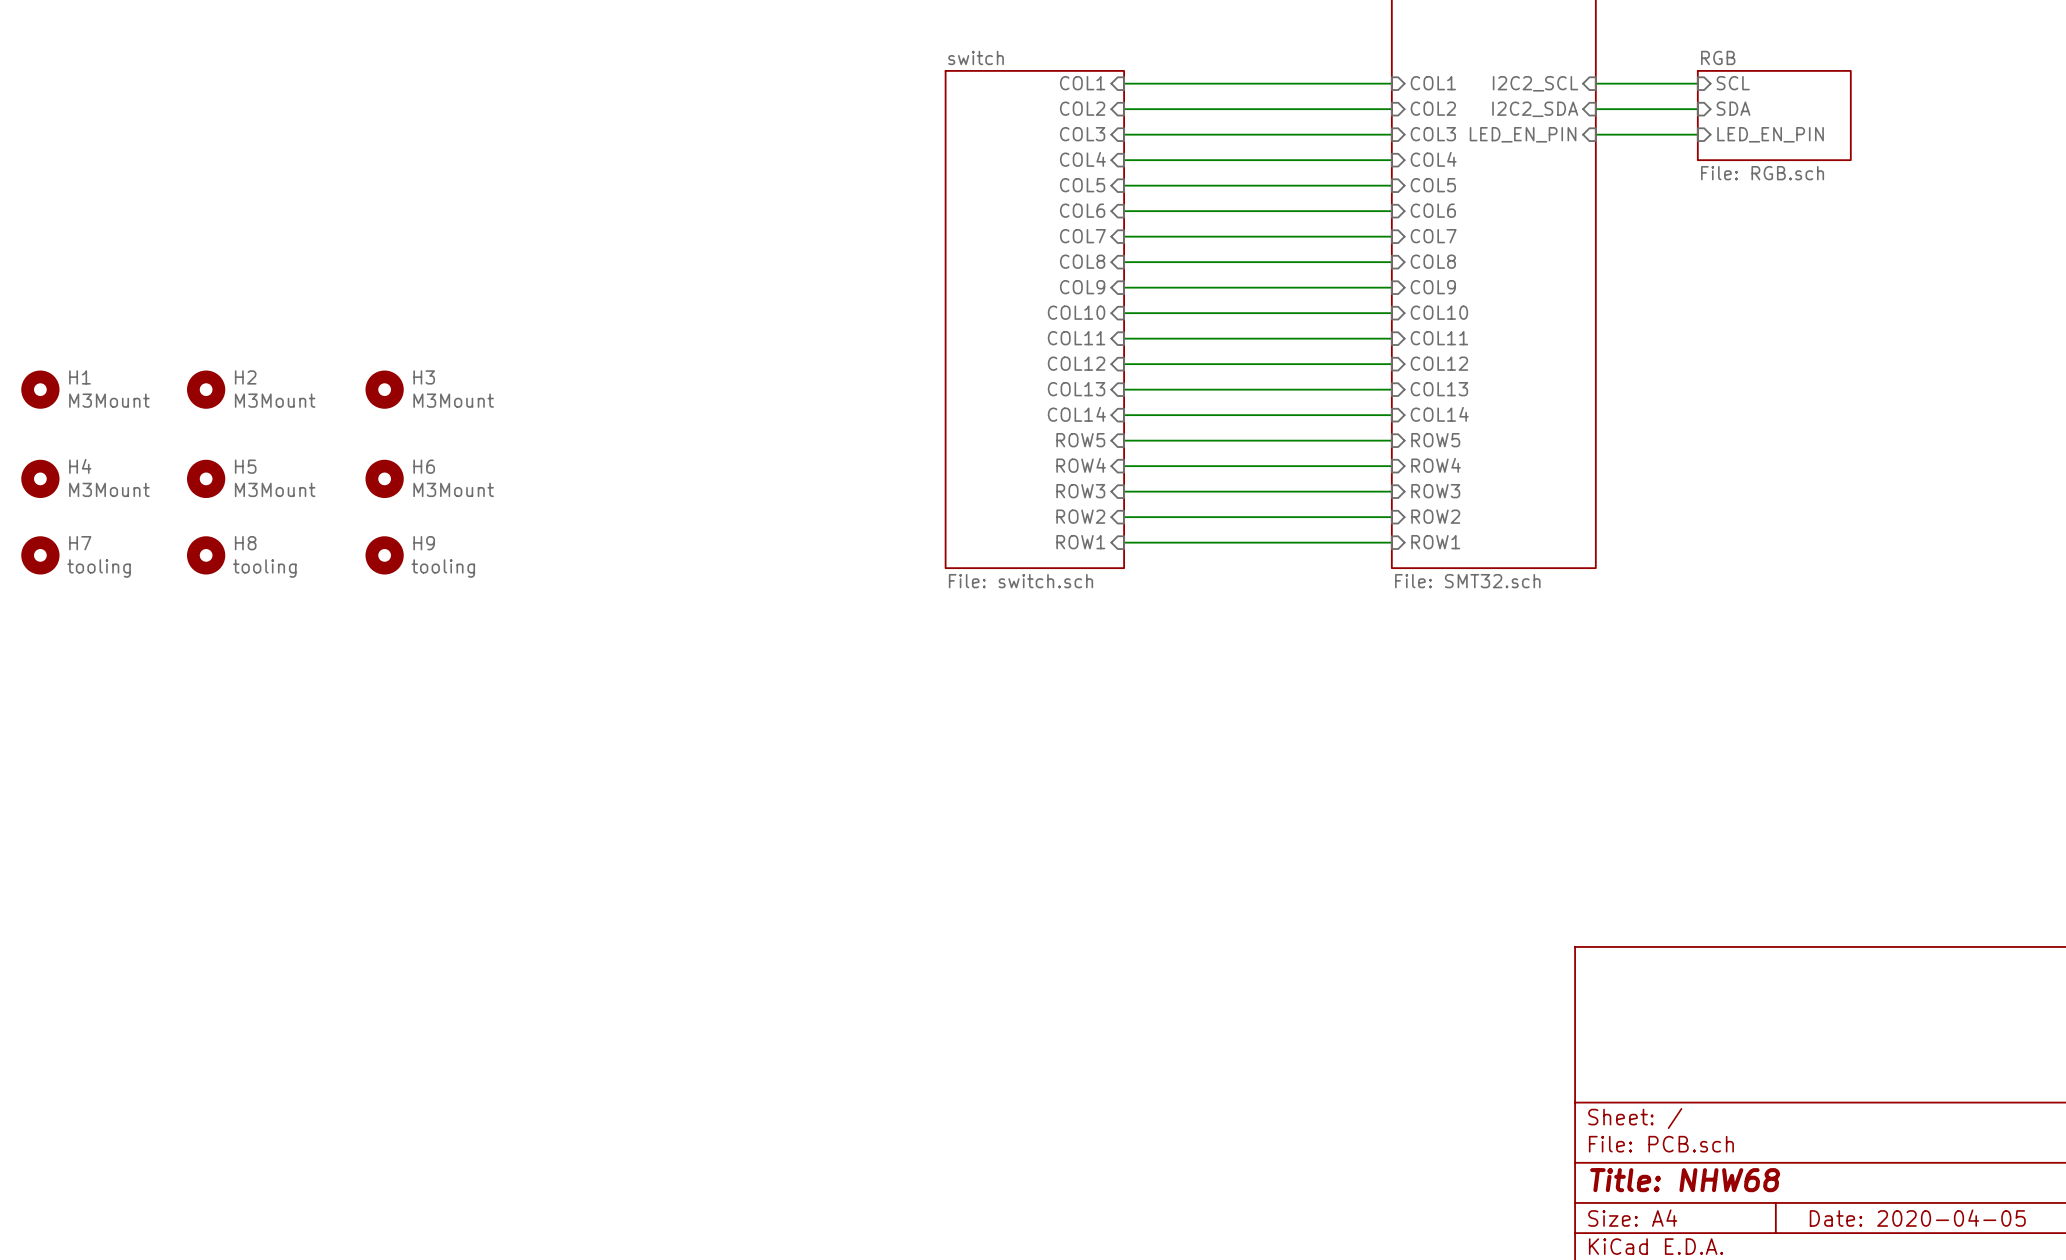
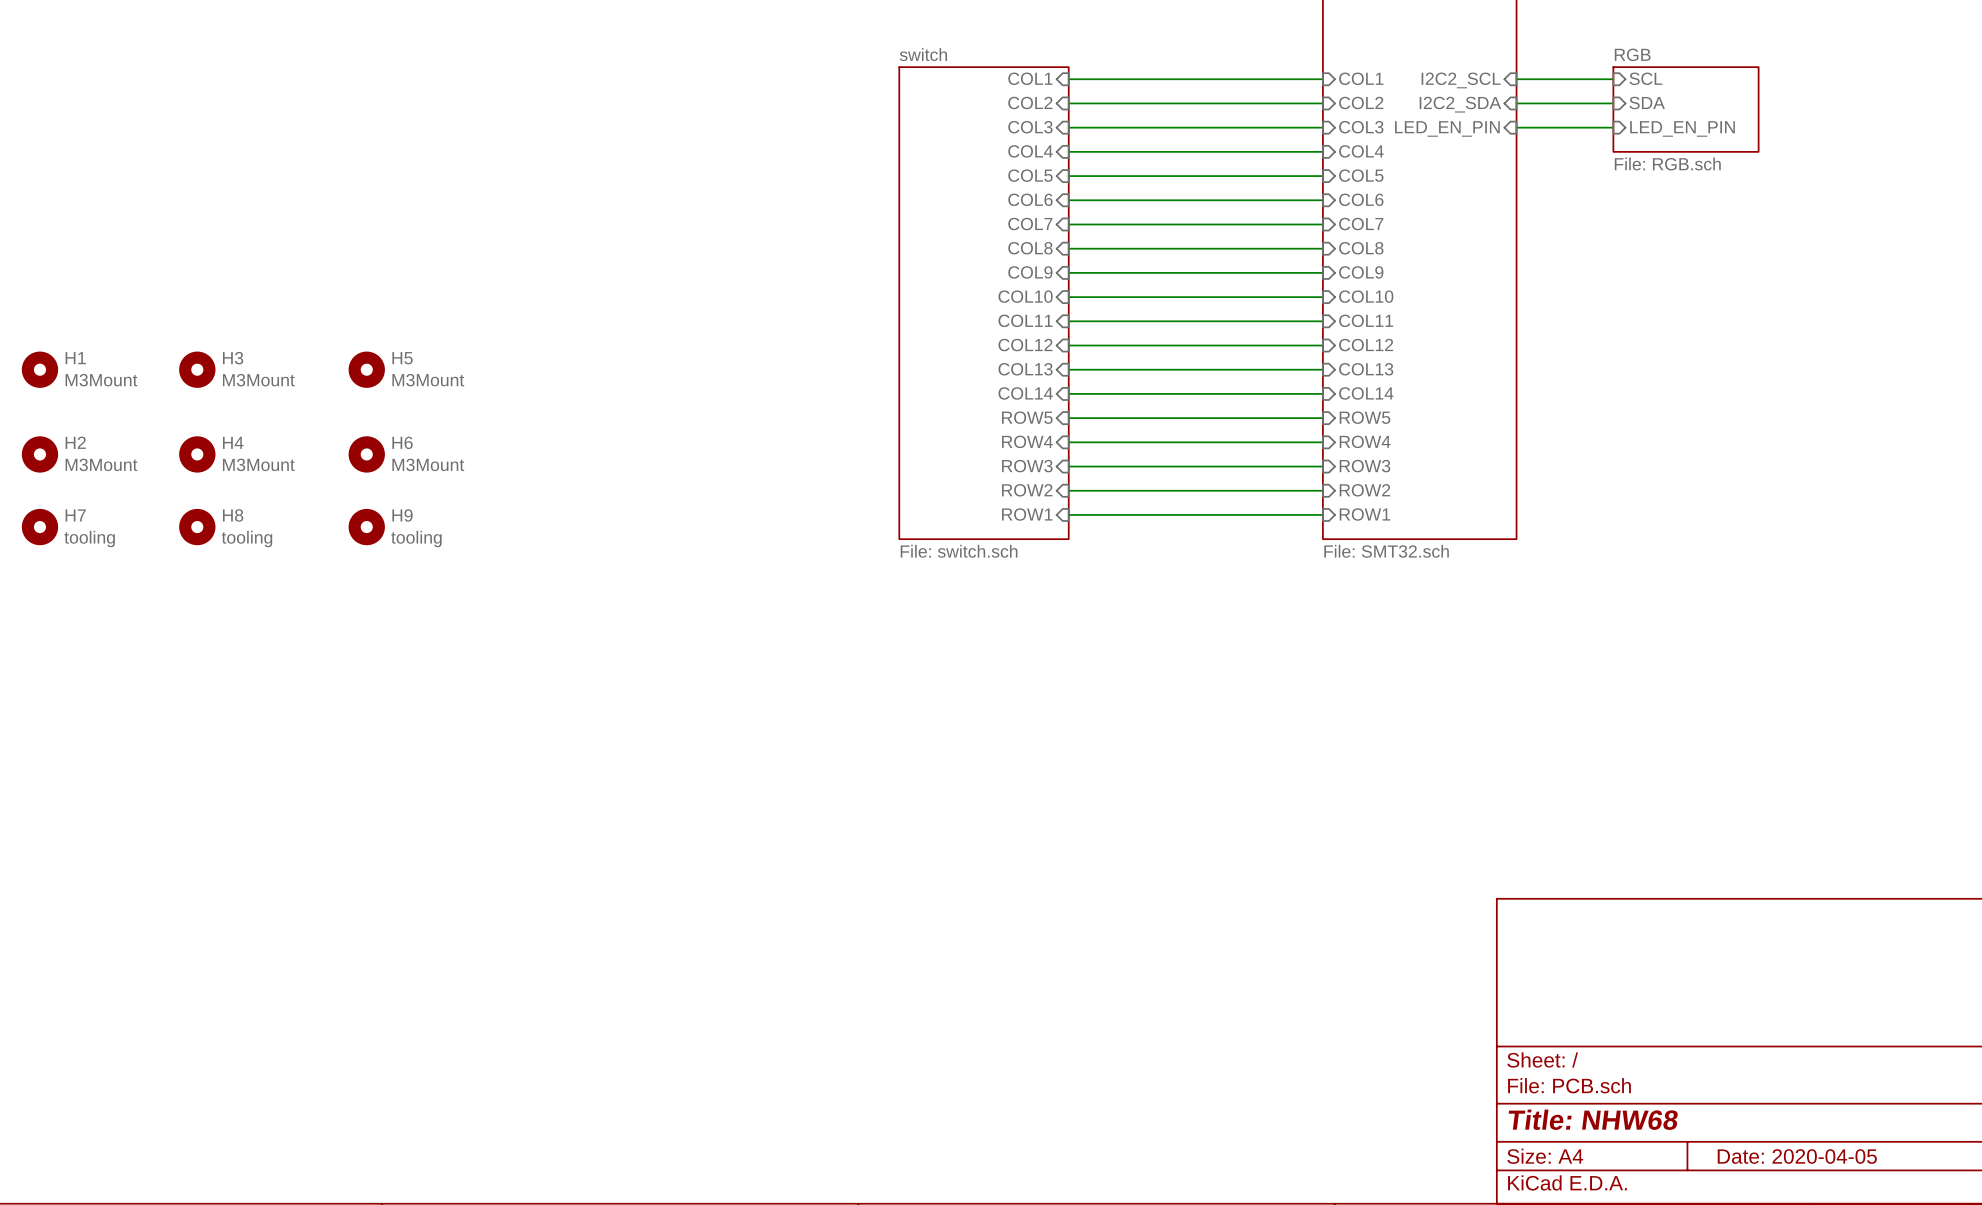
H2 name: H2 (245, 377) -> H3 (233, 358)
H3 name: H3 (424, 377) -> H5 (402, 358)
H4 name: H4 (80, 466) -> H2 (75, 442)
H5 name: H5 (245, 466) -> H4 (233, 442)

